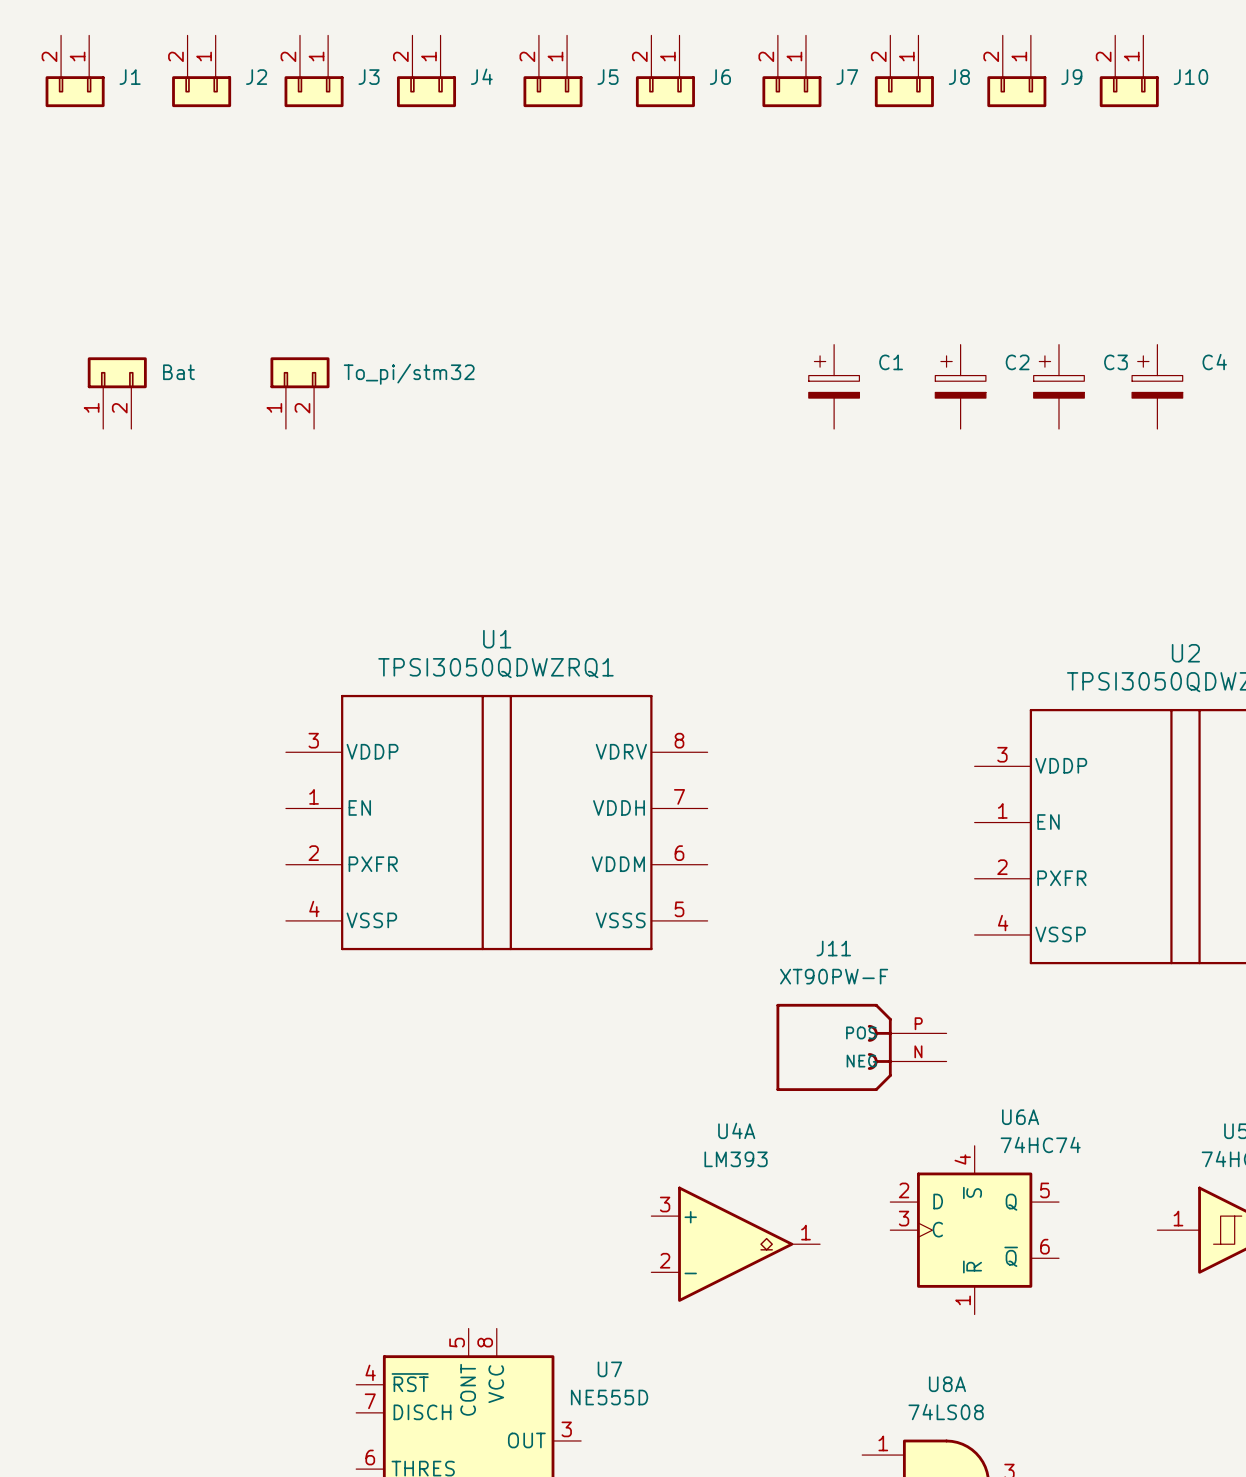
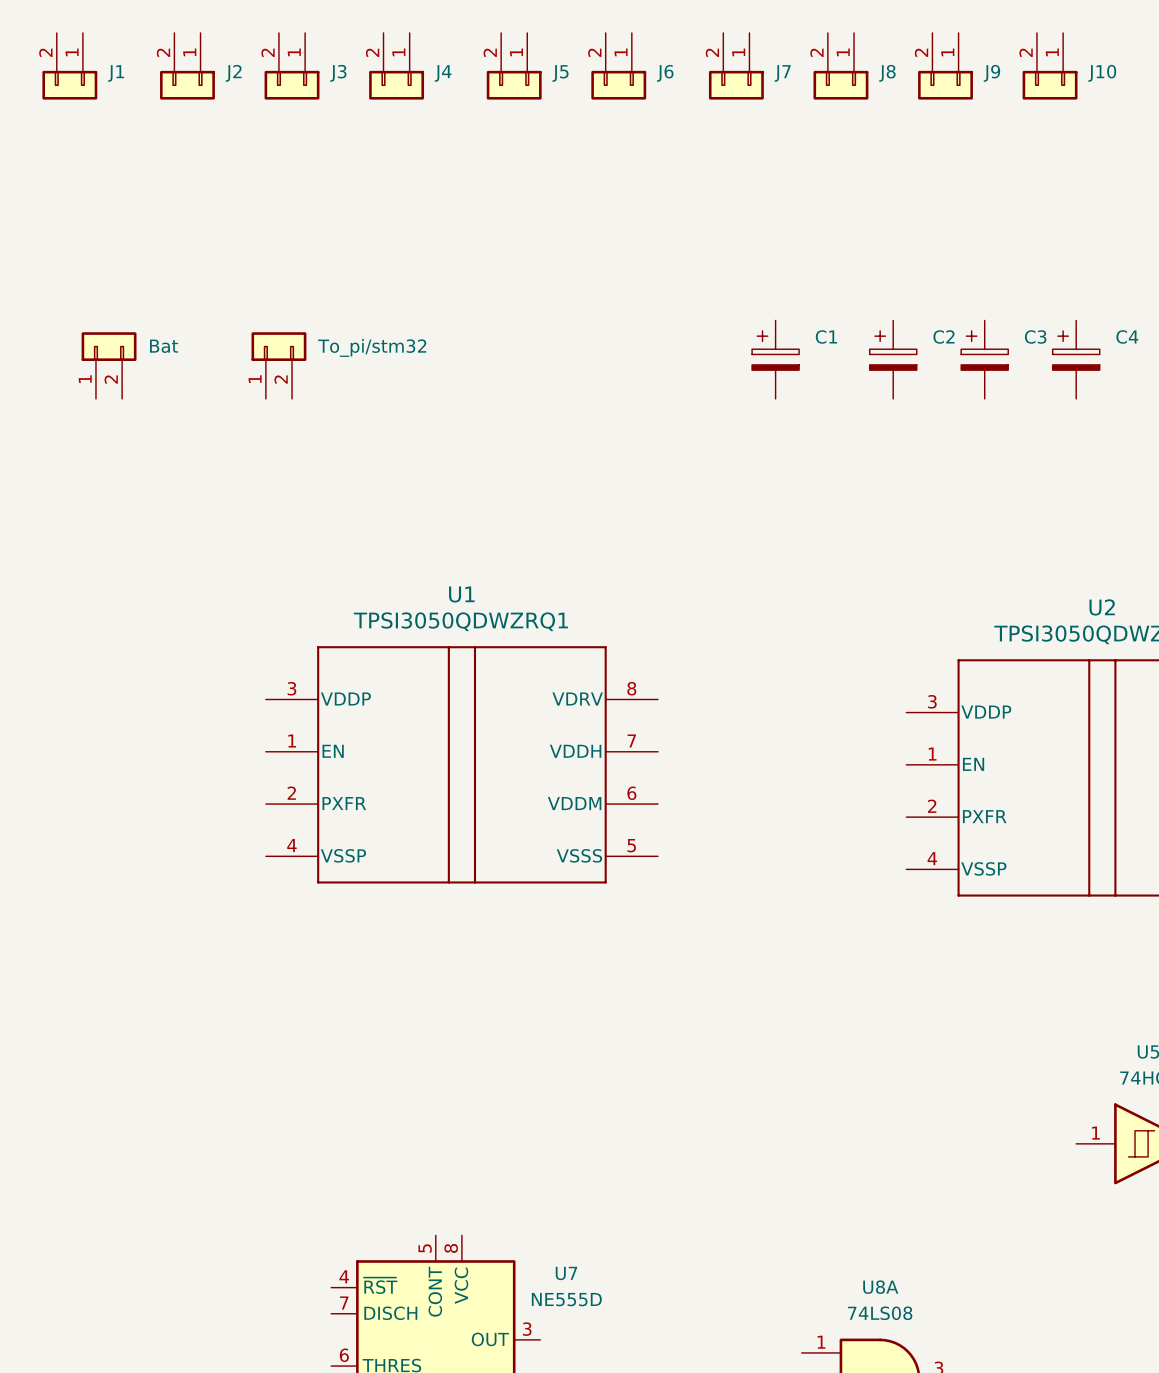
J11: XT90PW-F (861, 1047) -> none
U6A: 74HC74 (974, 1230) -> none
U4A: LM393 (735, 1244) -> none

